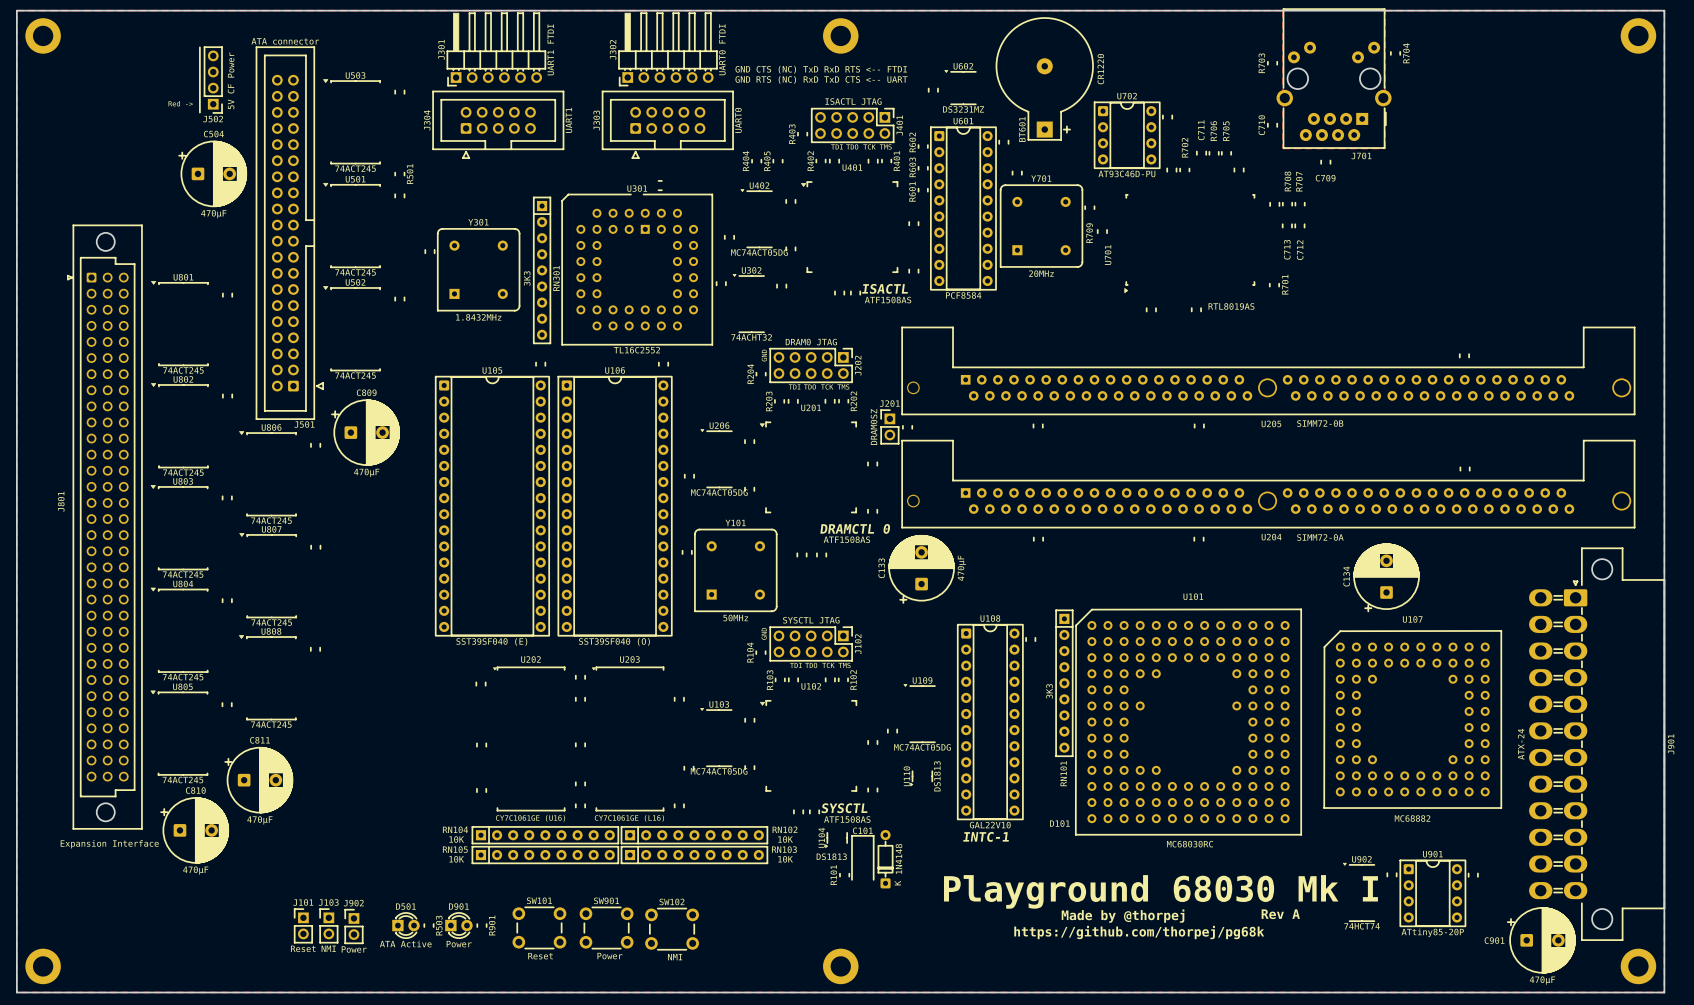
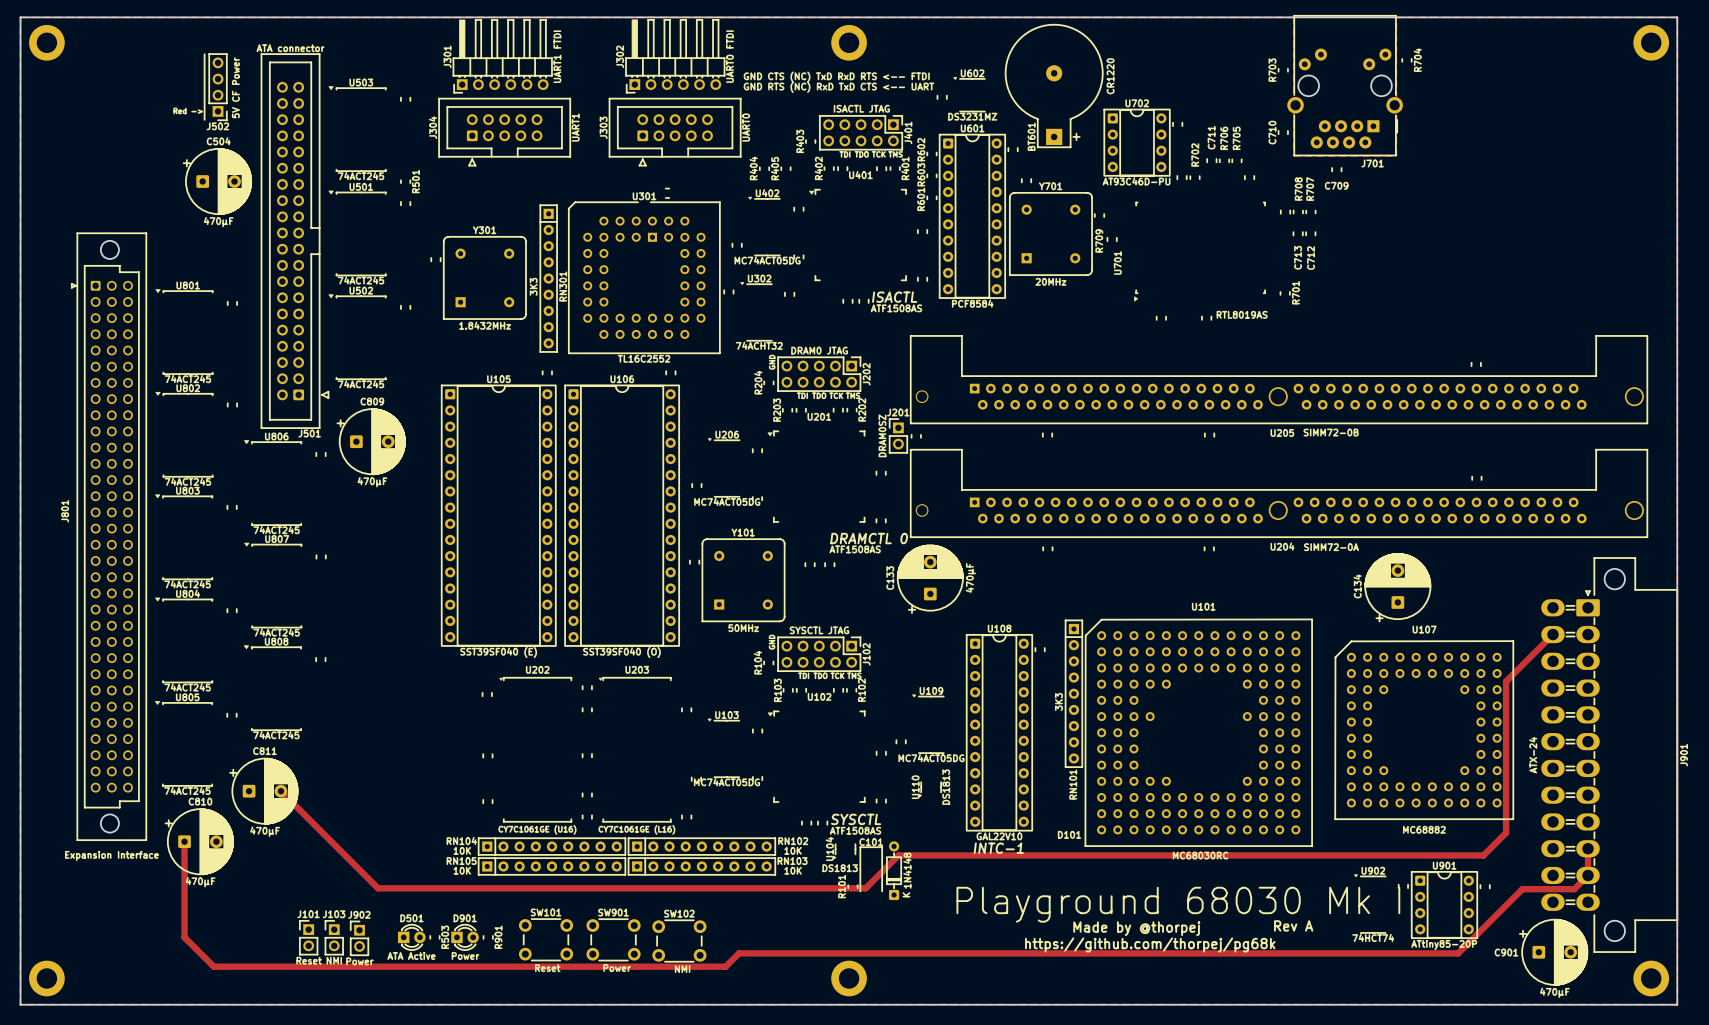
track: none -> (1552, 634) (1506, 681) (1506, 832) (1483, 855) (898, 855) (865, 888) (378, 888) (280, 791)
track: none -> (184, 841) (184, 937) (213, 966) (725, 966) (738, 953) (1458, 953) (1522, 889) (1574, 889) (1588, 875) (1588, 848)

